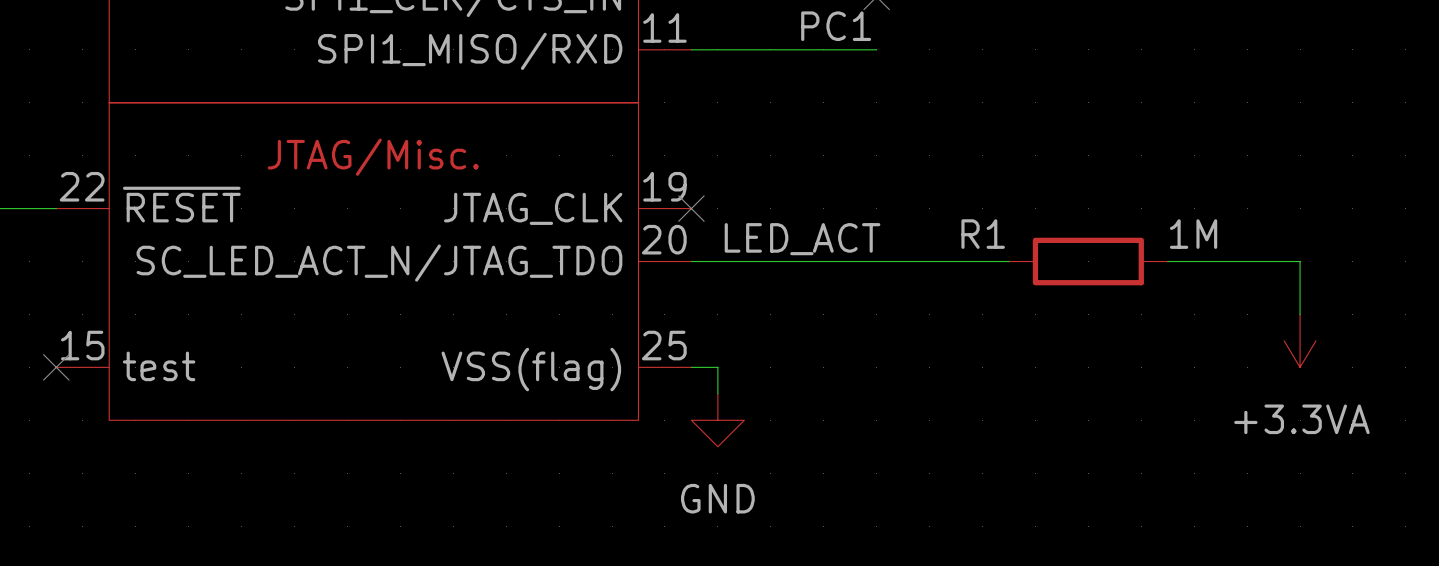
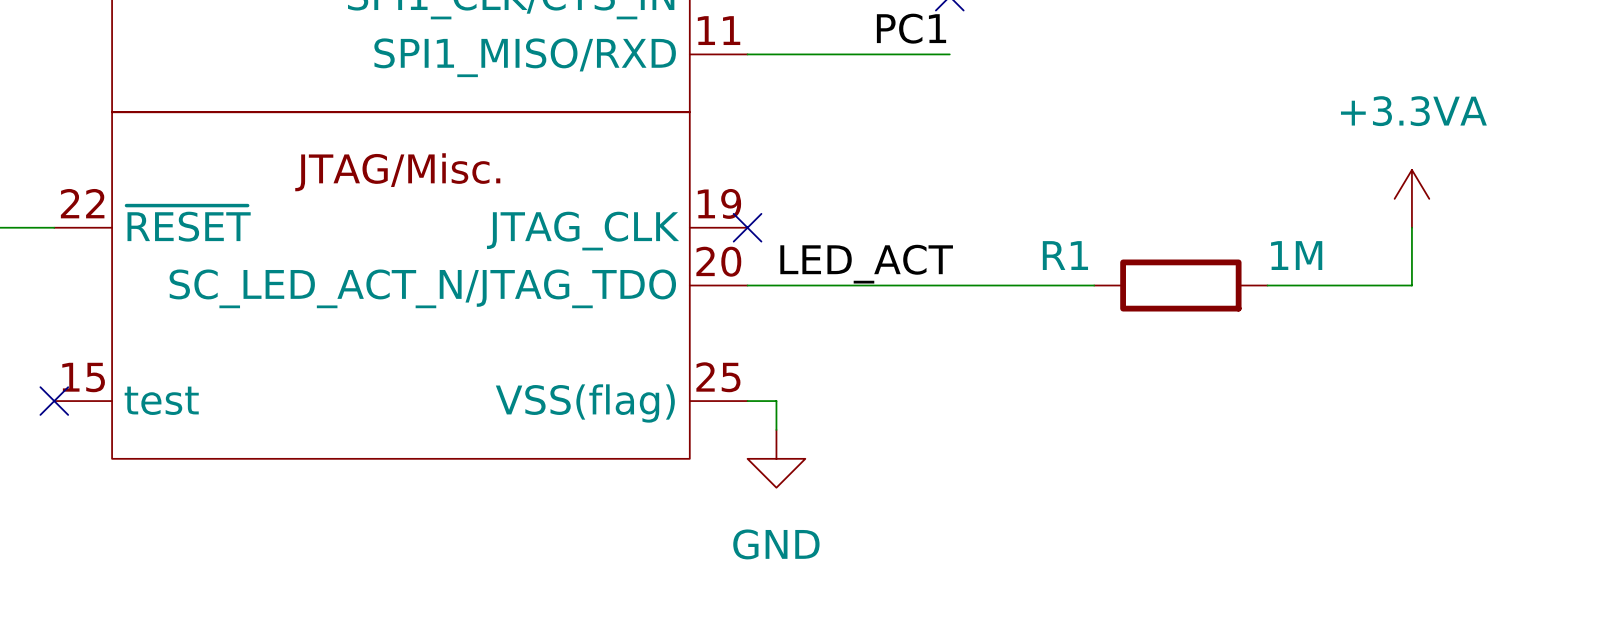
wire: (1300, 261) (1300, 314) -> (1411, 285) (1411, 227)
power symbol rotation: 0° (1300, 340) -> 180° (1411, 198)
power symbol position: +3.3VA (1300, 340) -> +3.3VA (1411, 198)

